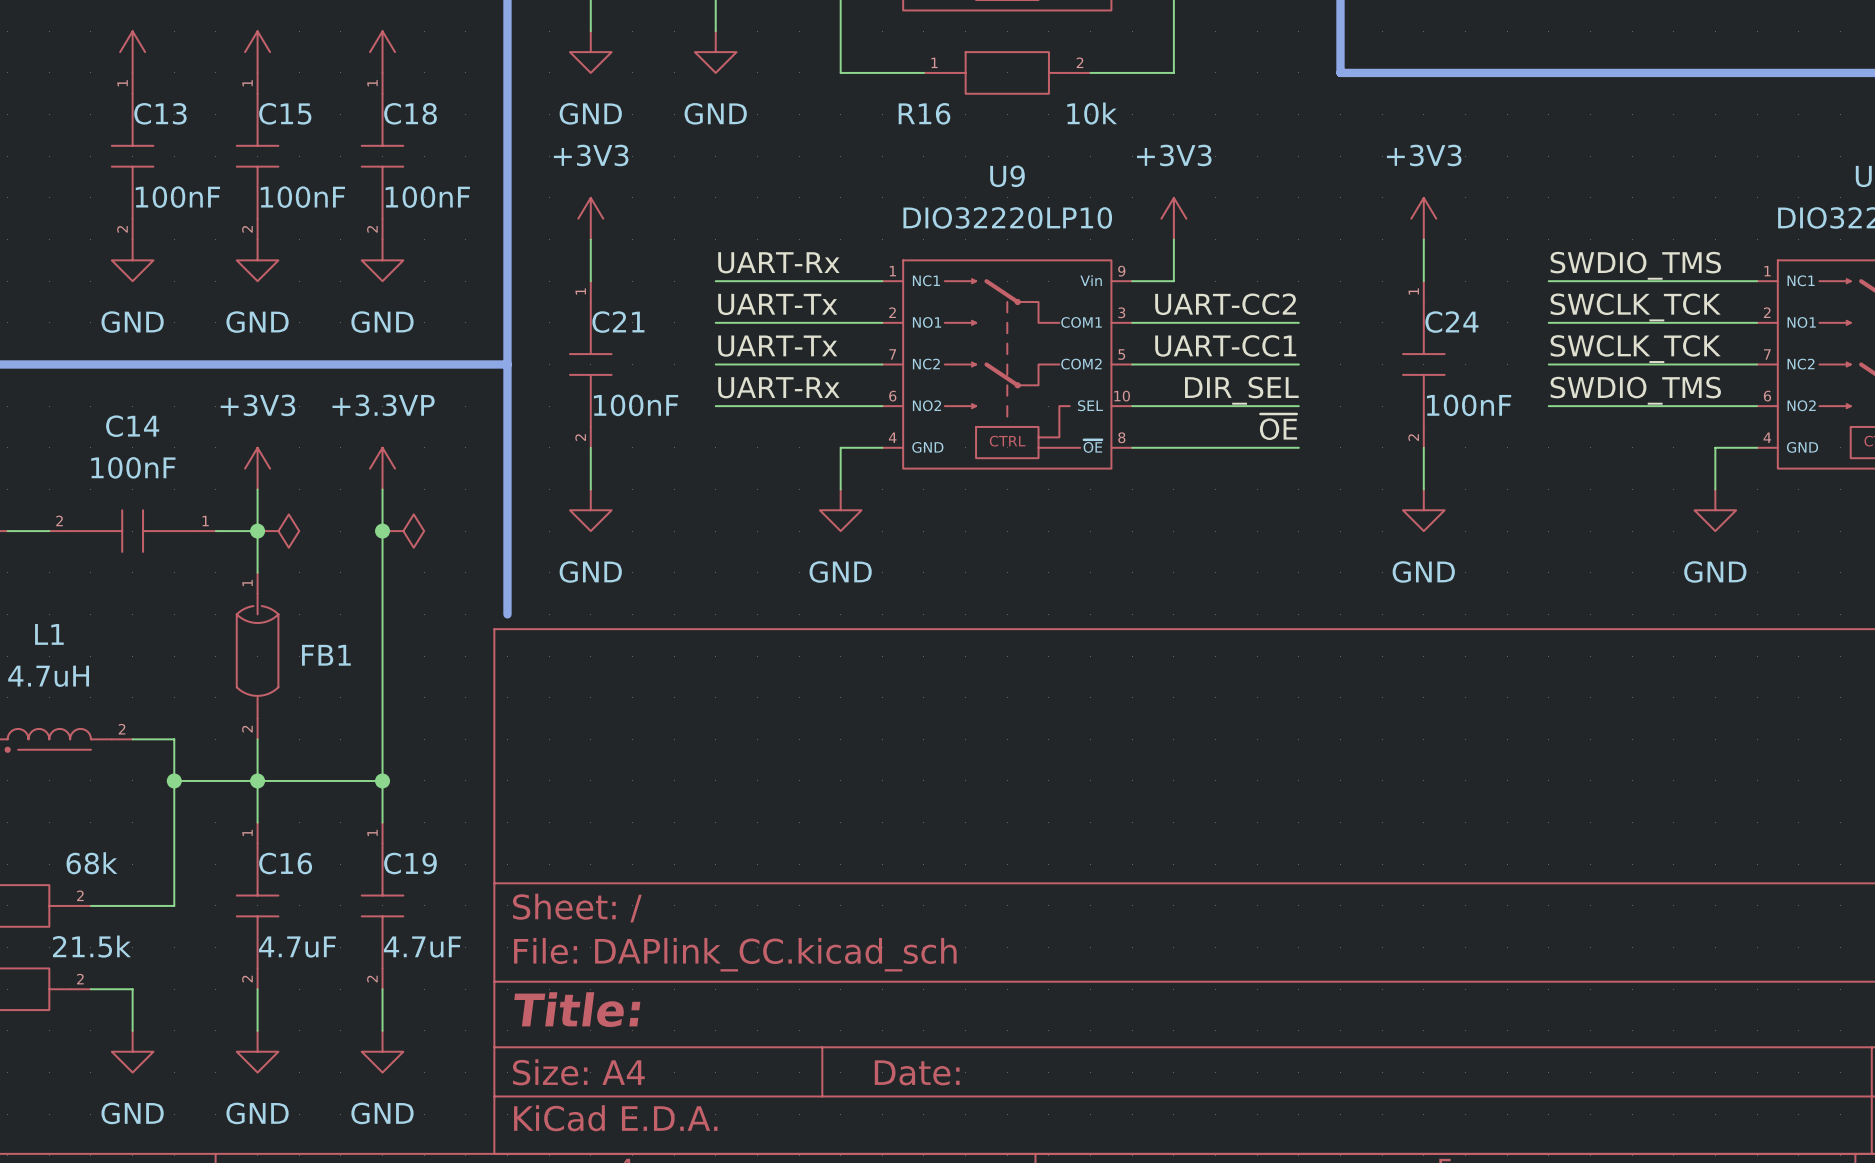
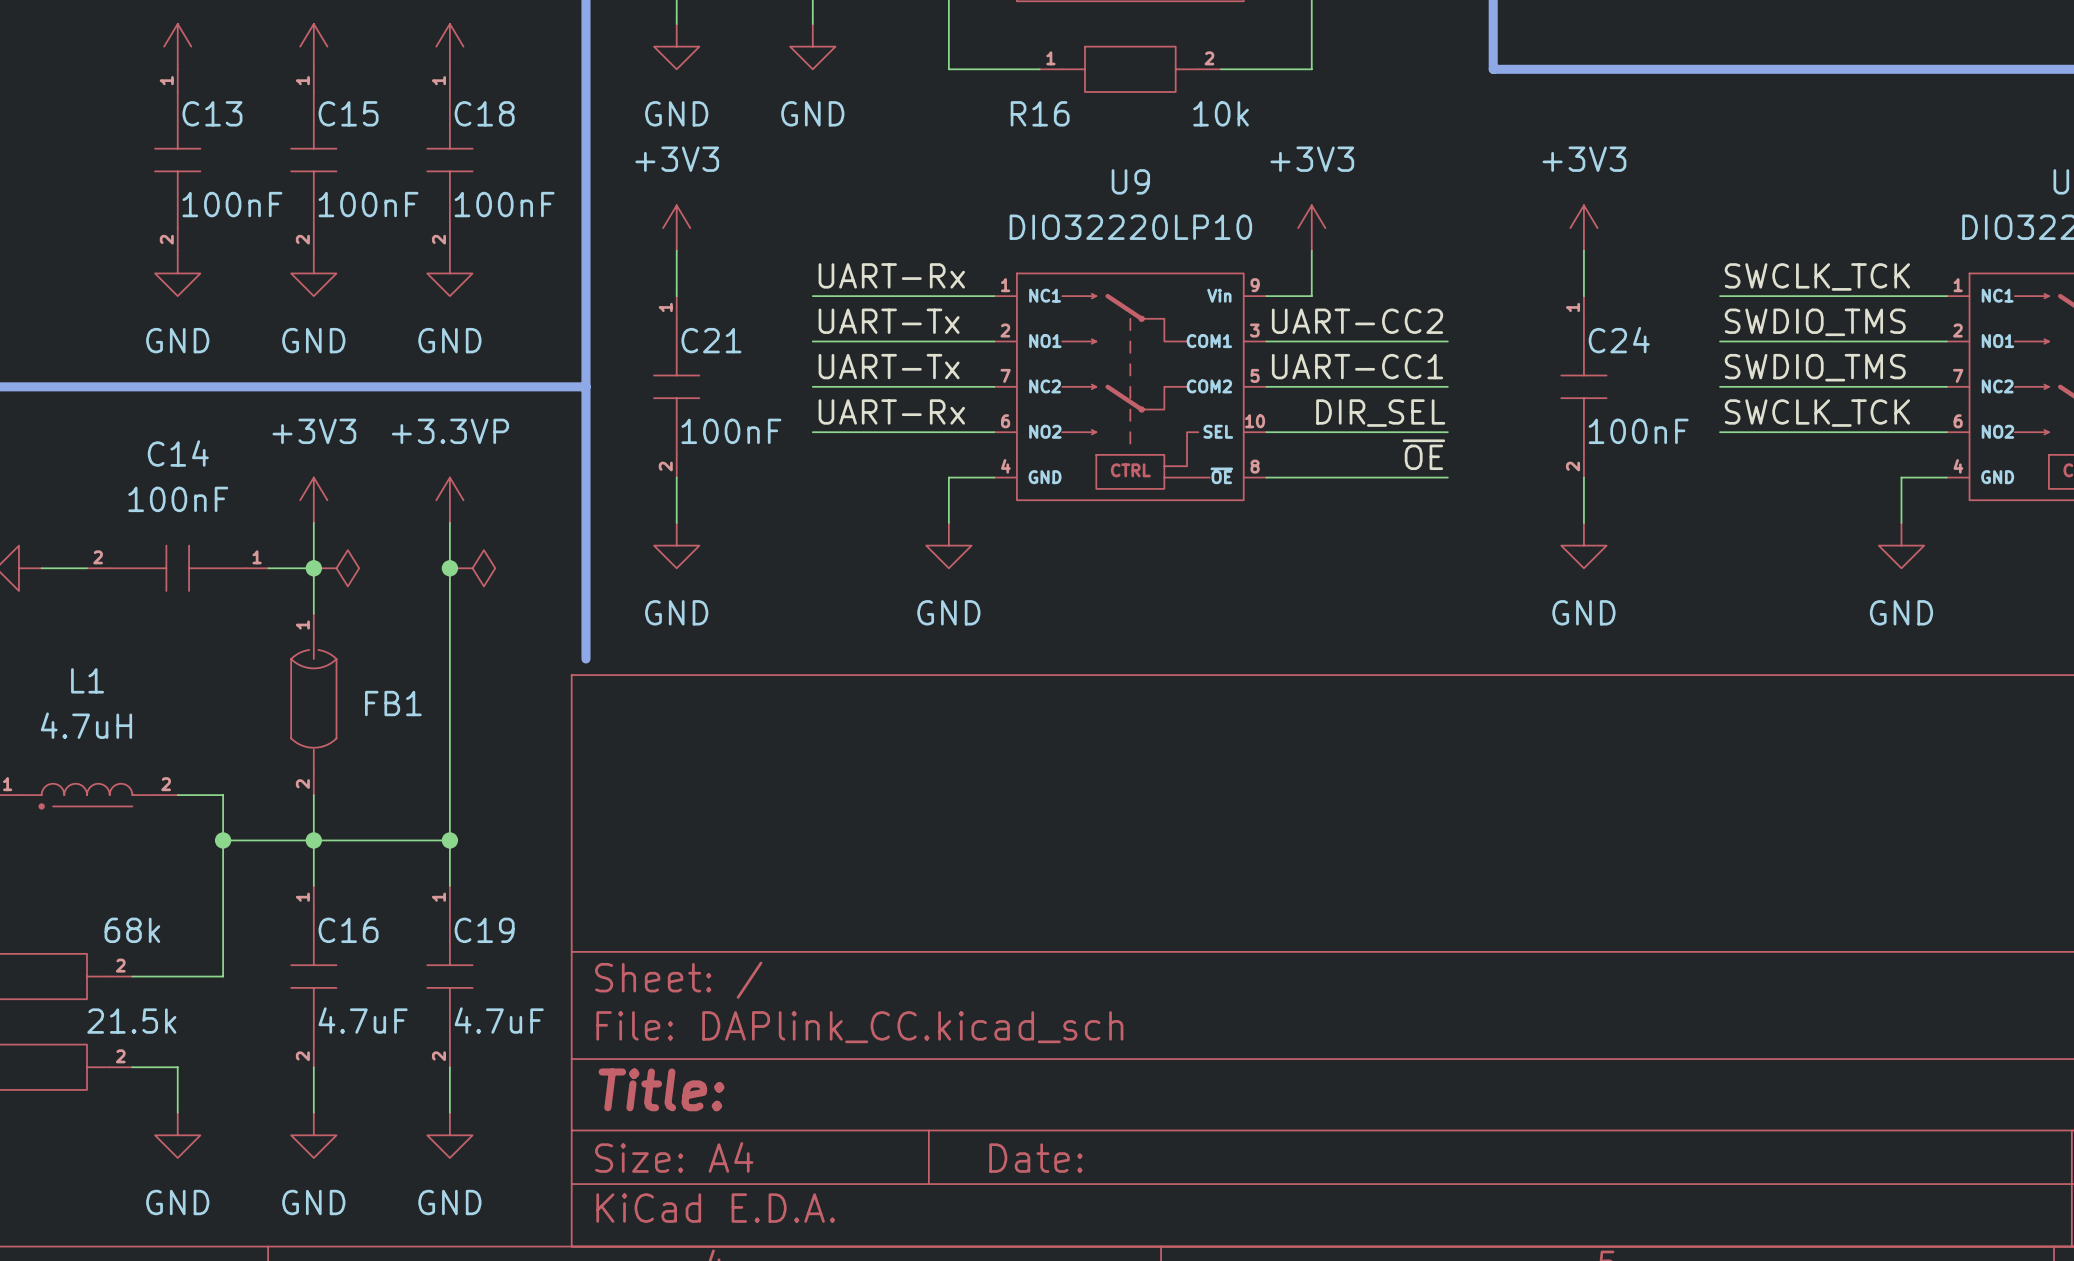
label: SWDIO_TMS (1635, 265) -> SWCLK_TCK (1817, 276)
label: SWCLK_TCK (1635, 307) -> SWDIO_TMS (1815, 322)
label: SWCLK_TCK (1635, 349) -> SWDIO_TMS (1815, 367)
label: SWDIO_TMS (1635, 390) -> SWCLK_TCK (1817, 413)

